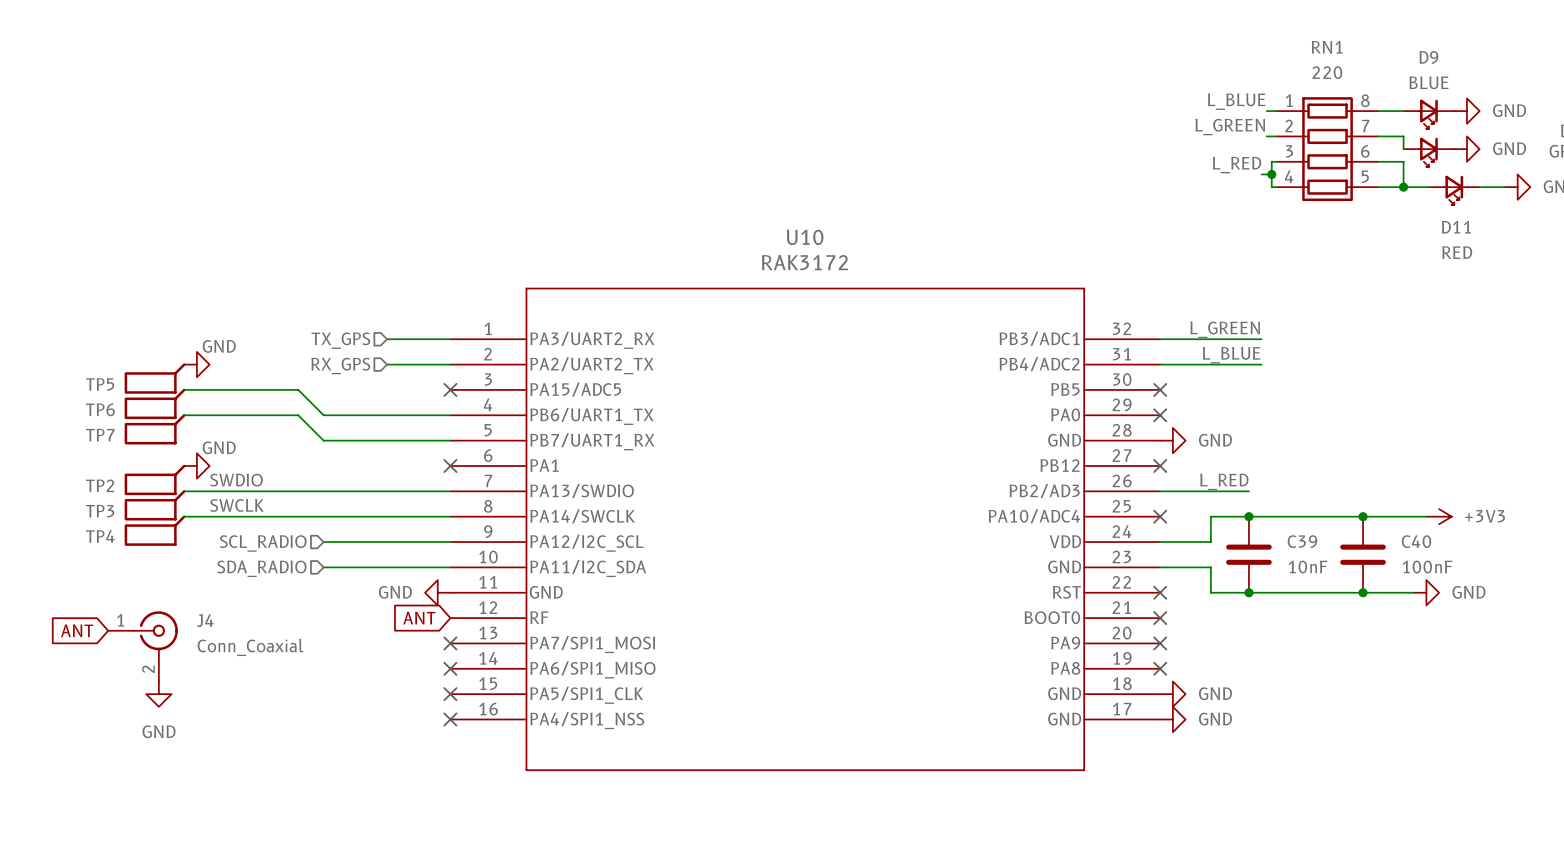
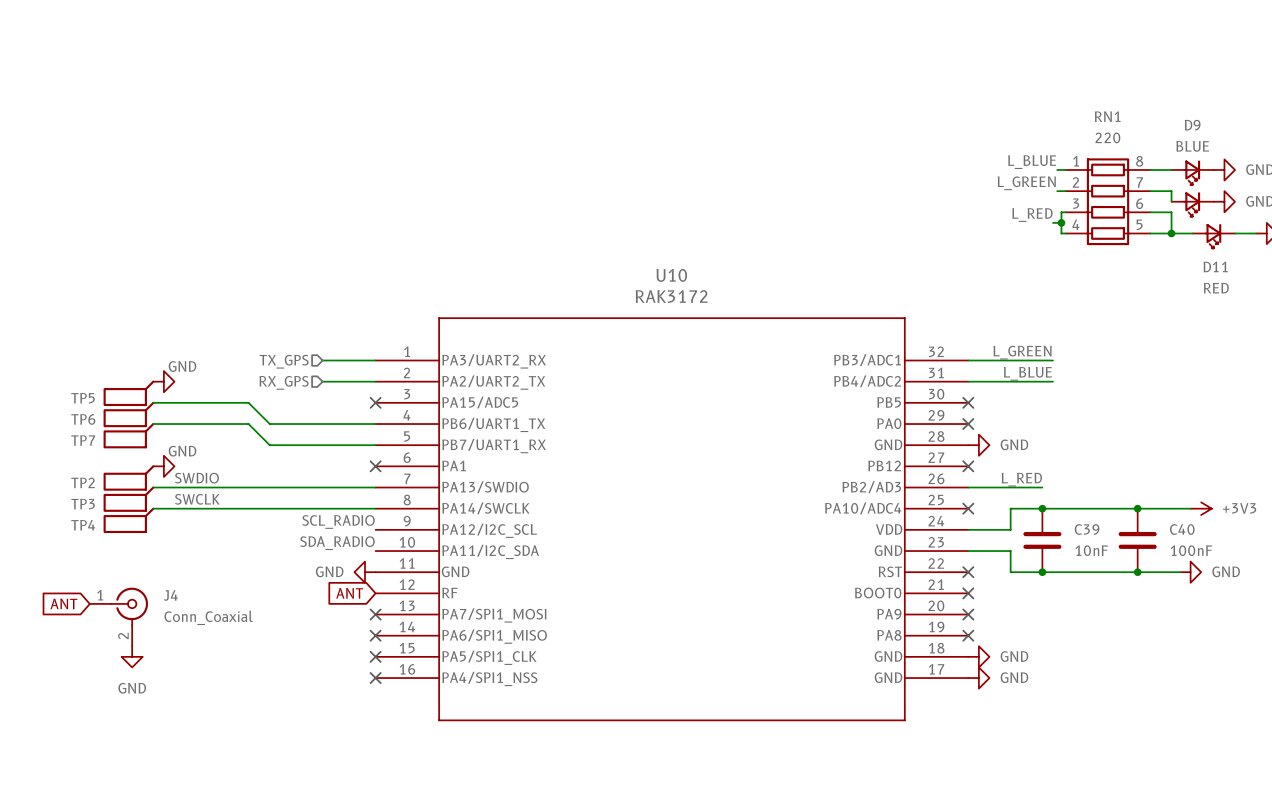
label: none -> SCL_RADIO (338, 521)
wire: (323, 542) (450, 542) -> none
hierarchical label: SCL_RADIO (263, 543) -> none
label: none -> SDA_RADIO (337, 543)
wire: (323, 567) (450, 567) -> none
hierarchical label: SDA_RADIO (261, 568) -> none

